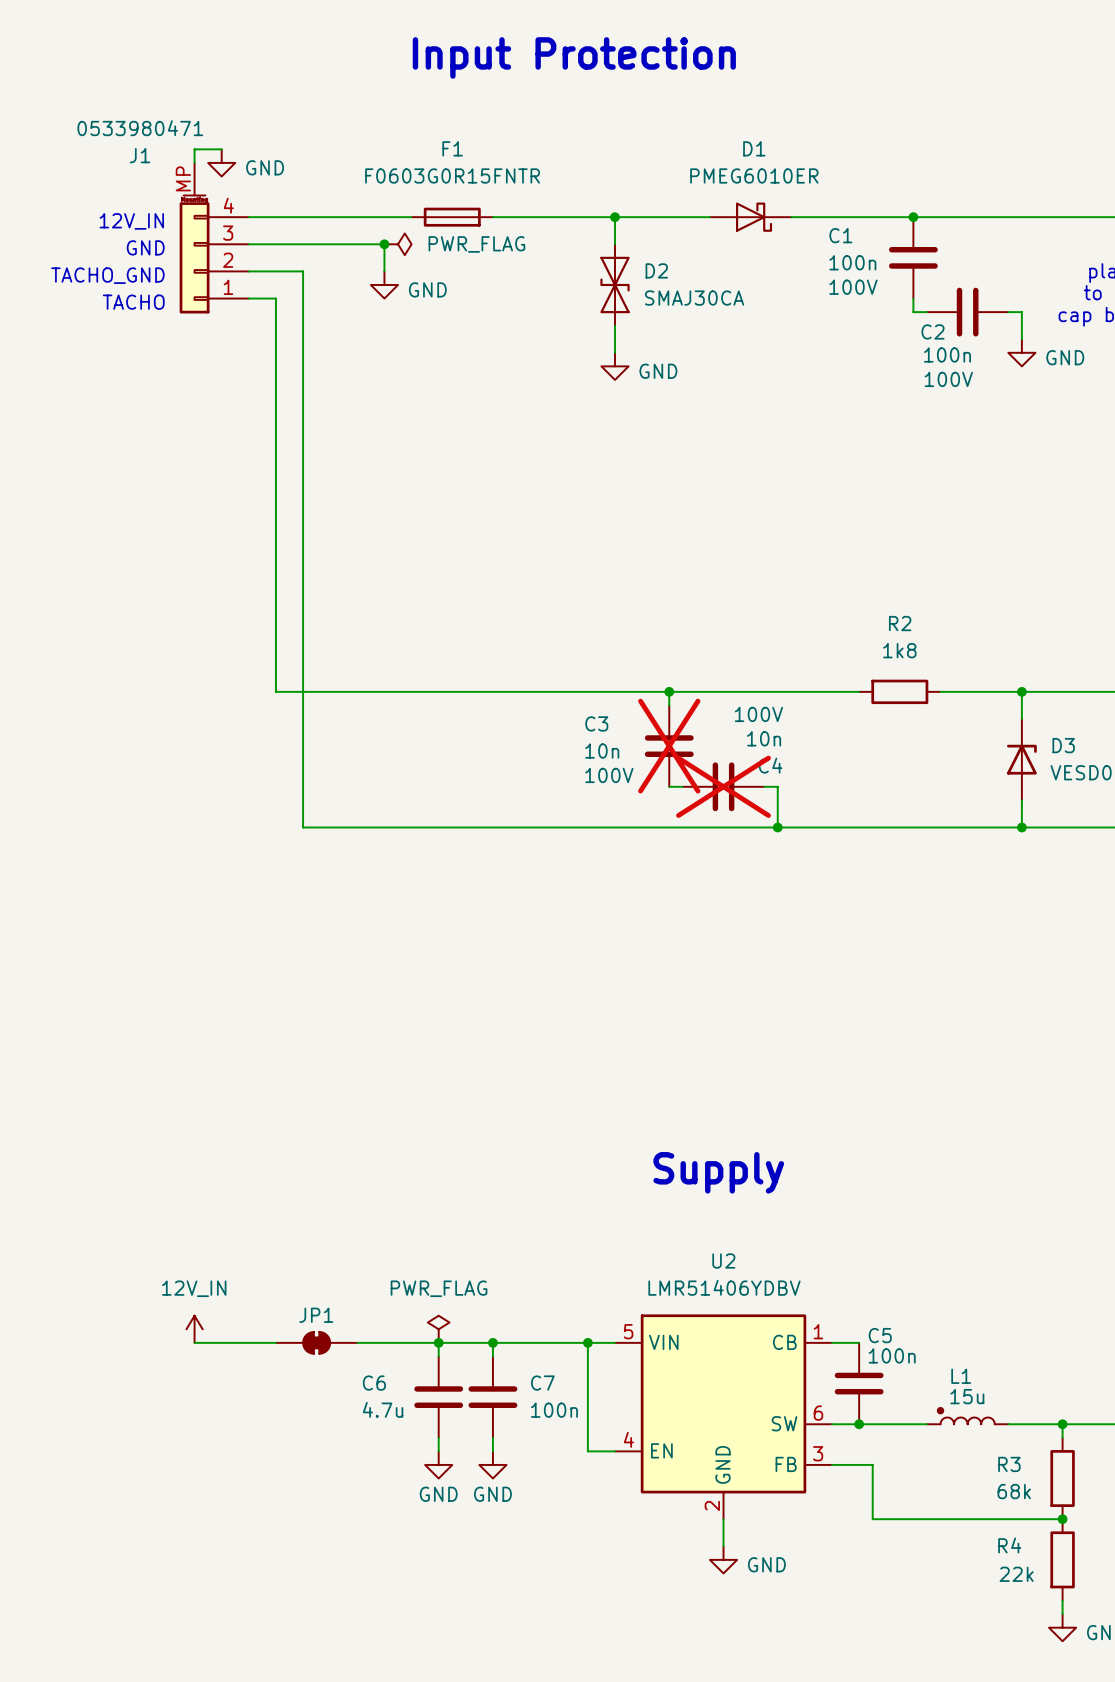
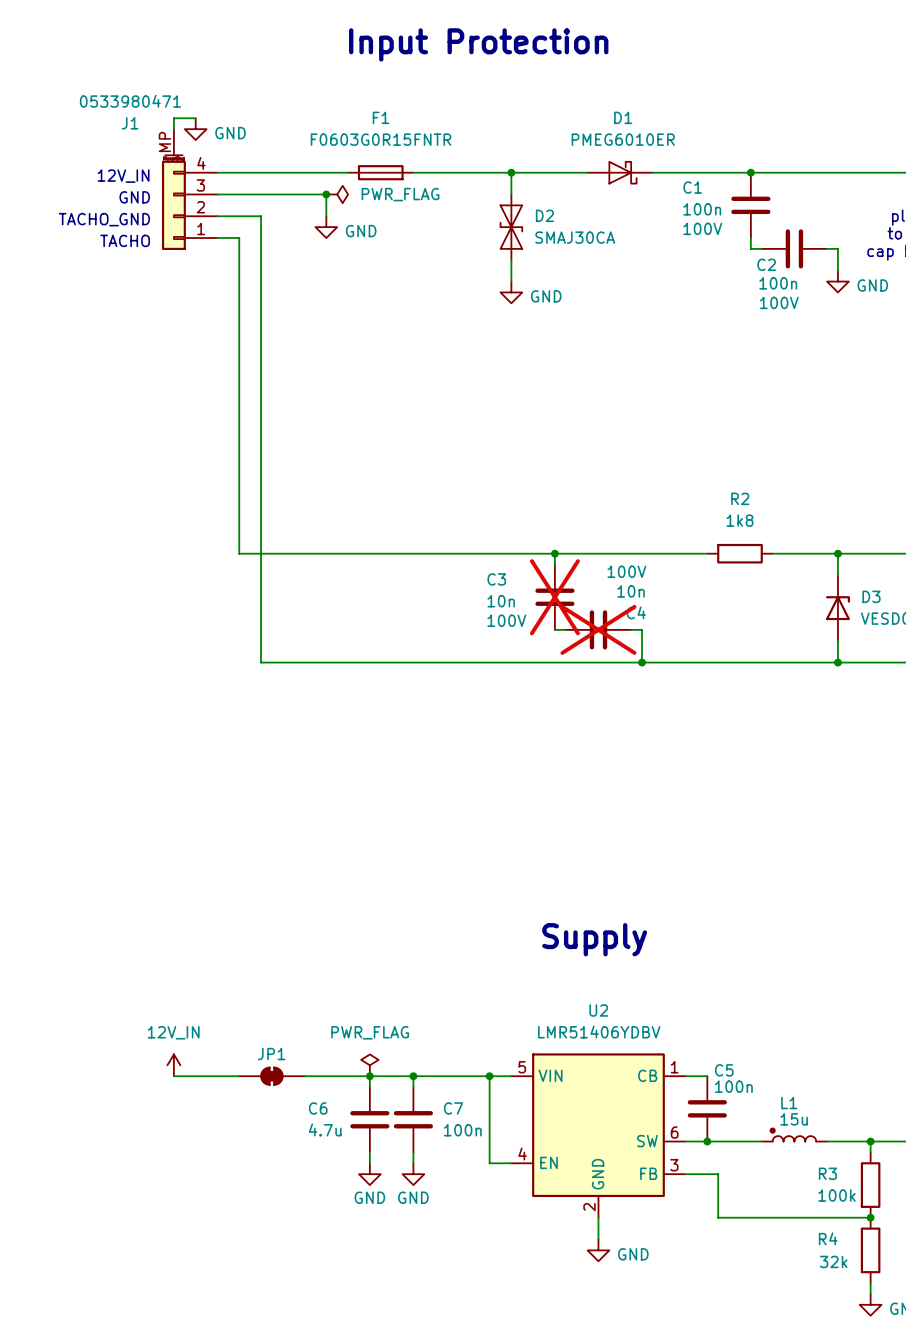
R3 value: 68k (1014, 1491) -> 100k (837, 1195)
R4 value: 22k (1016, 1574) -> 32k (833, 1261)

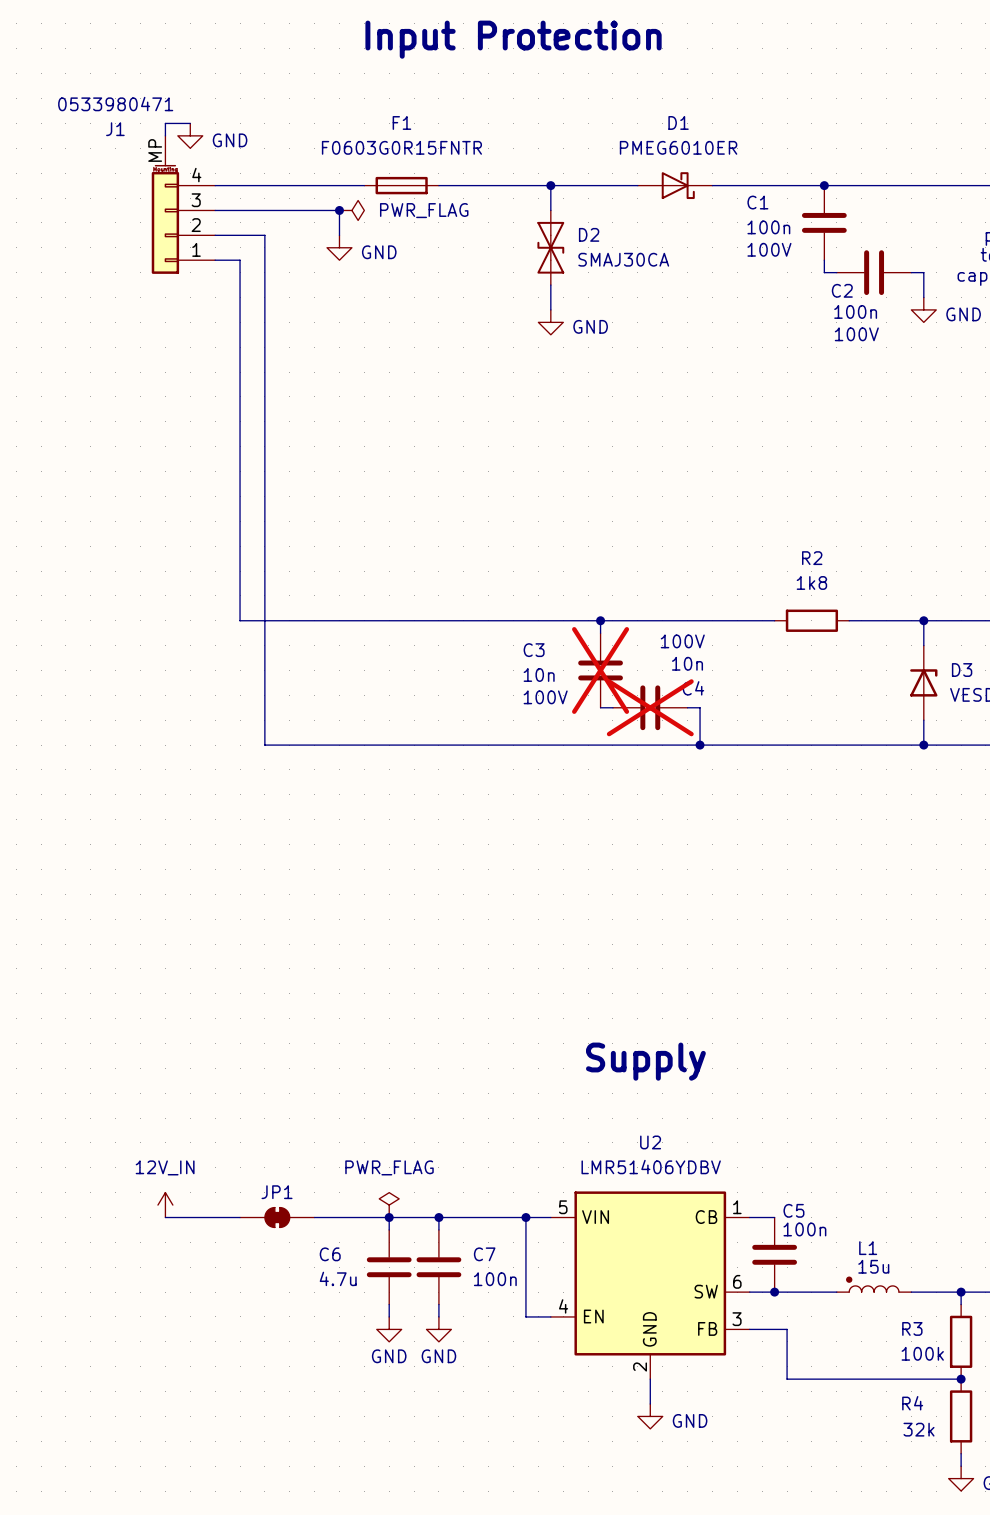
text: 12V_IN (123, 176) -> none
text: GND (134, 197) -> none
text: TACHO_GND (104, 219) -> none
text: TACHO (125, 240) -> none

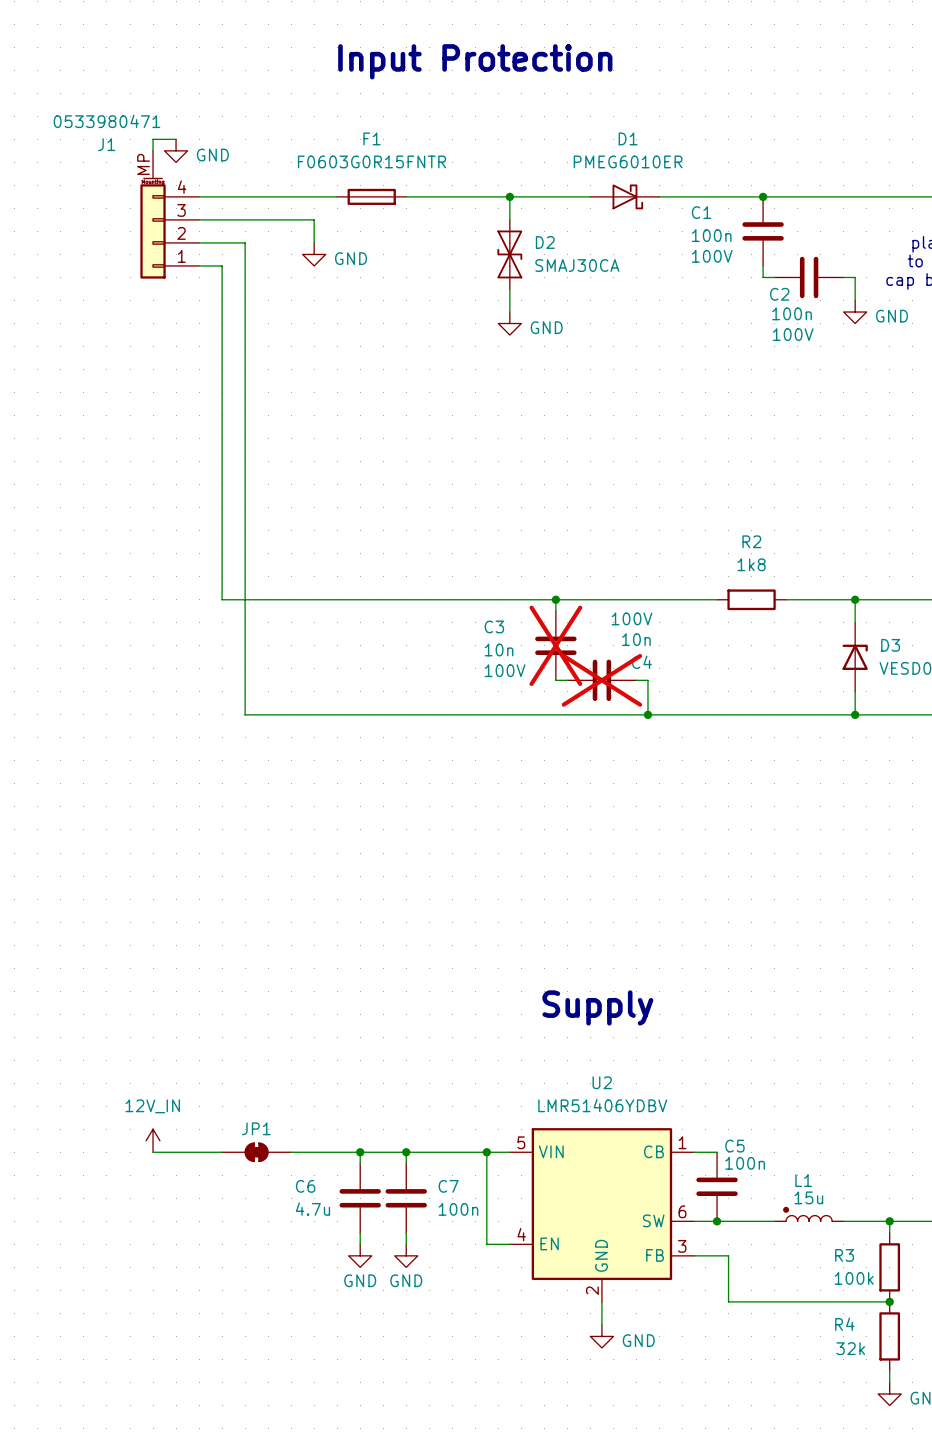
junction: (339, 210) -> none
power symbol: PWR_FLAG (351, 210) -> none
power symbol: PWR_FLAG (389, 1205) -> none

